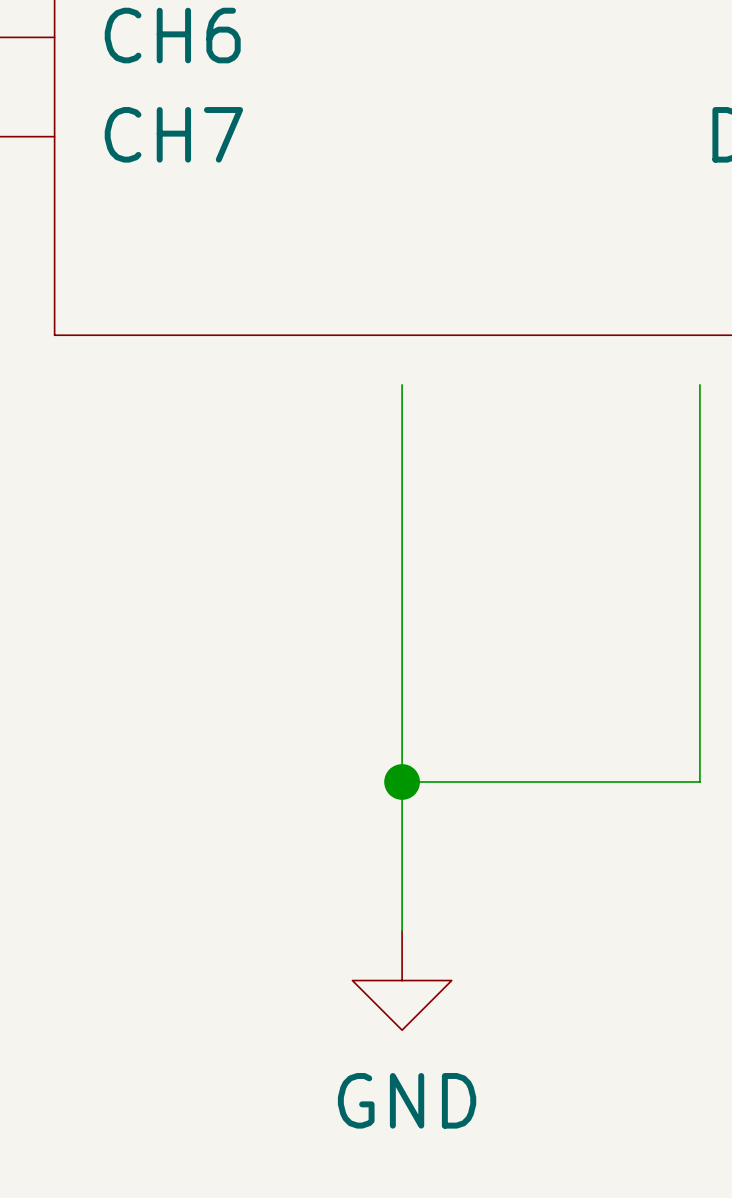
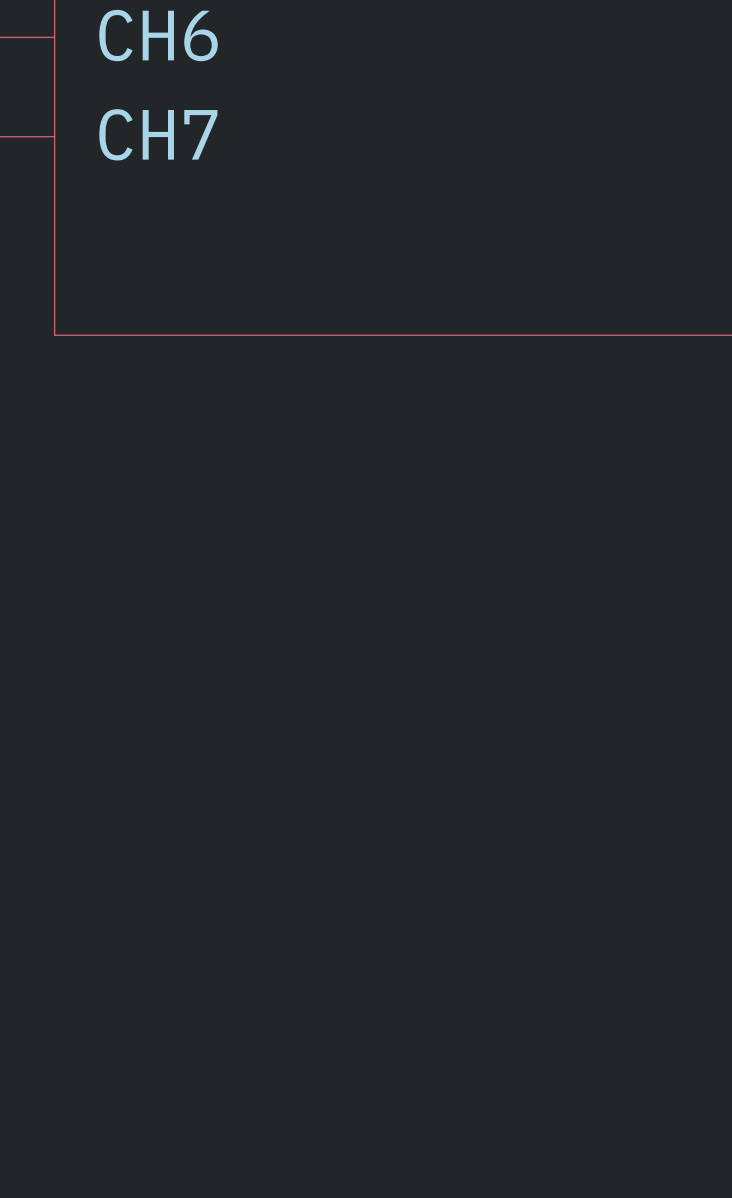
wire: (402, 384) (402, 930) -> none
wire: (699, 384) (699, 781) (402, 781) -> none
junction: (402, 781) -> none
power symbol: GND (402, 980) -> none

